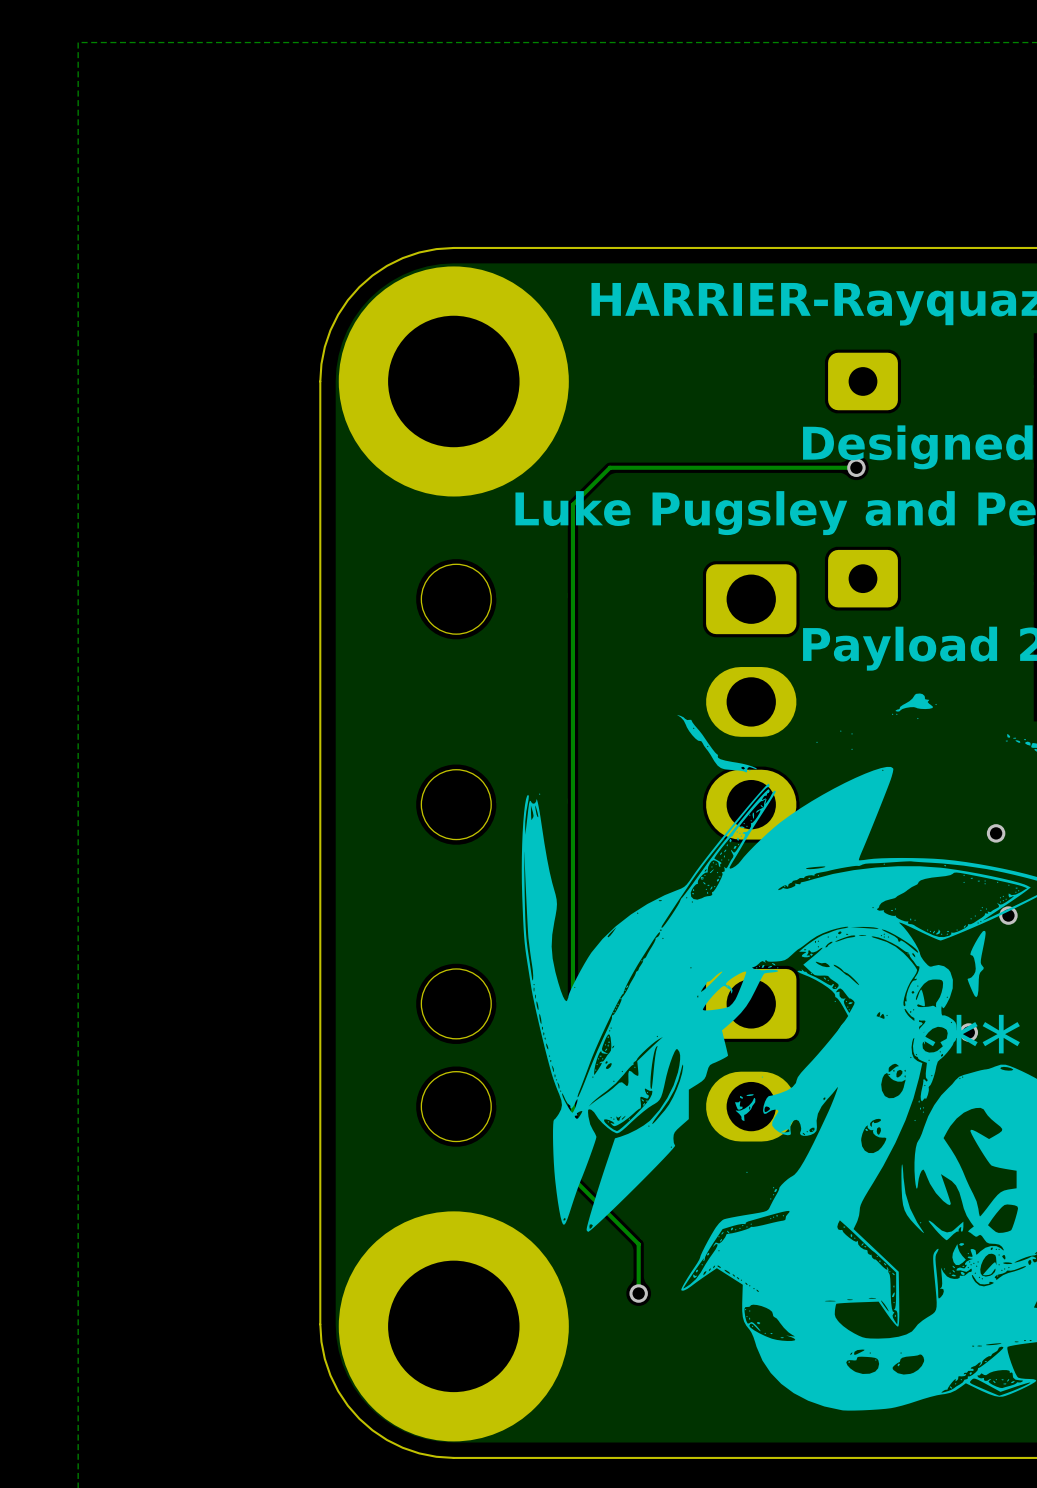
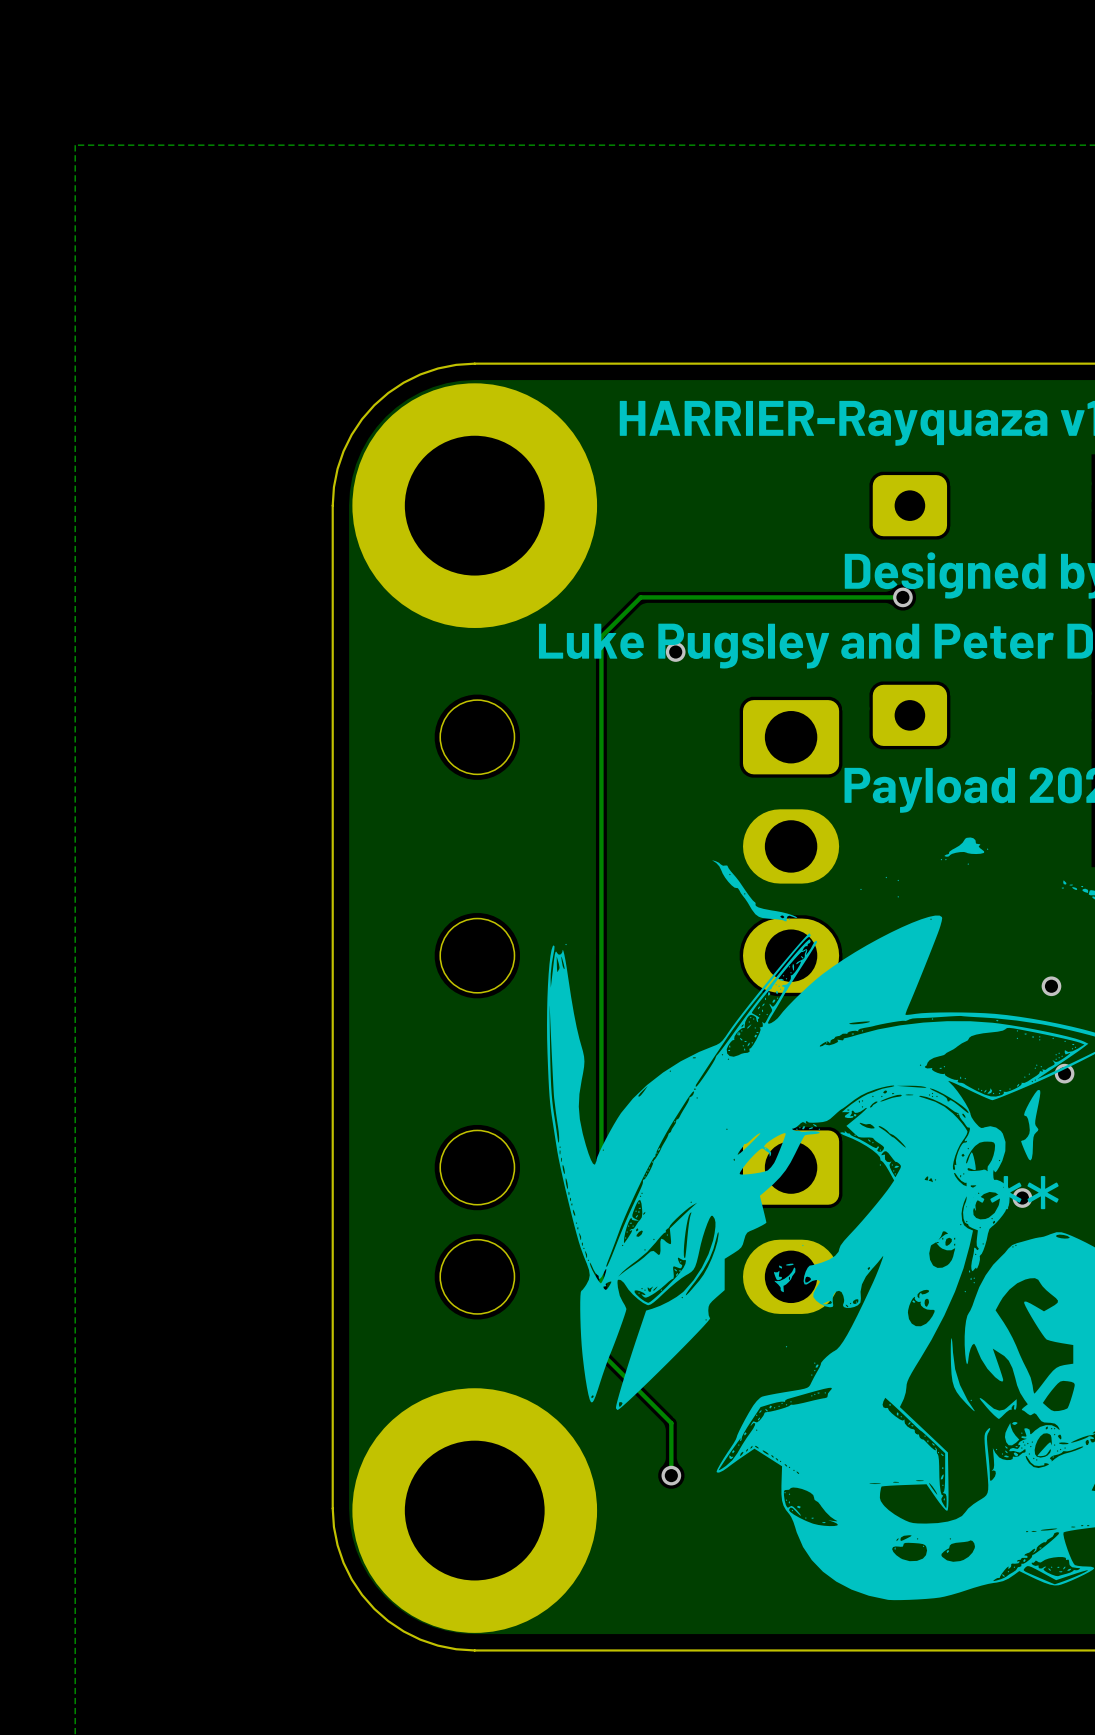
via: none -> (675, 652)

